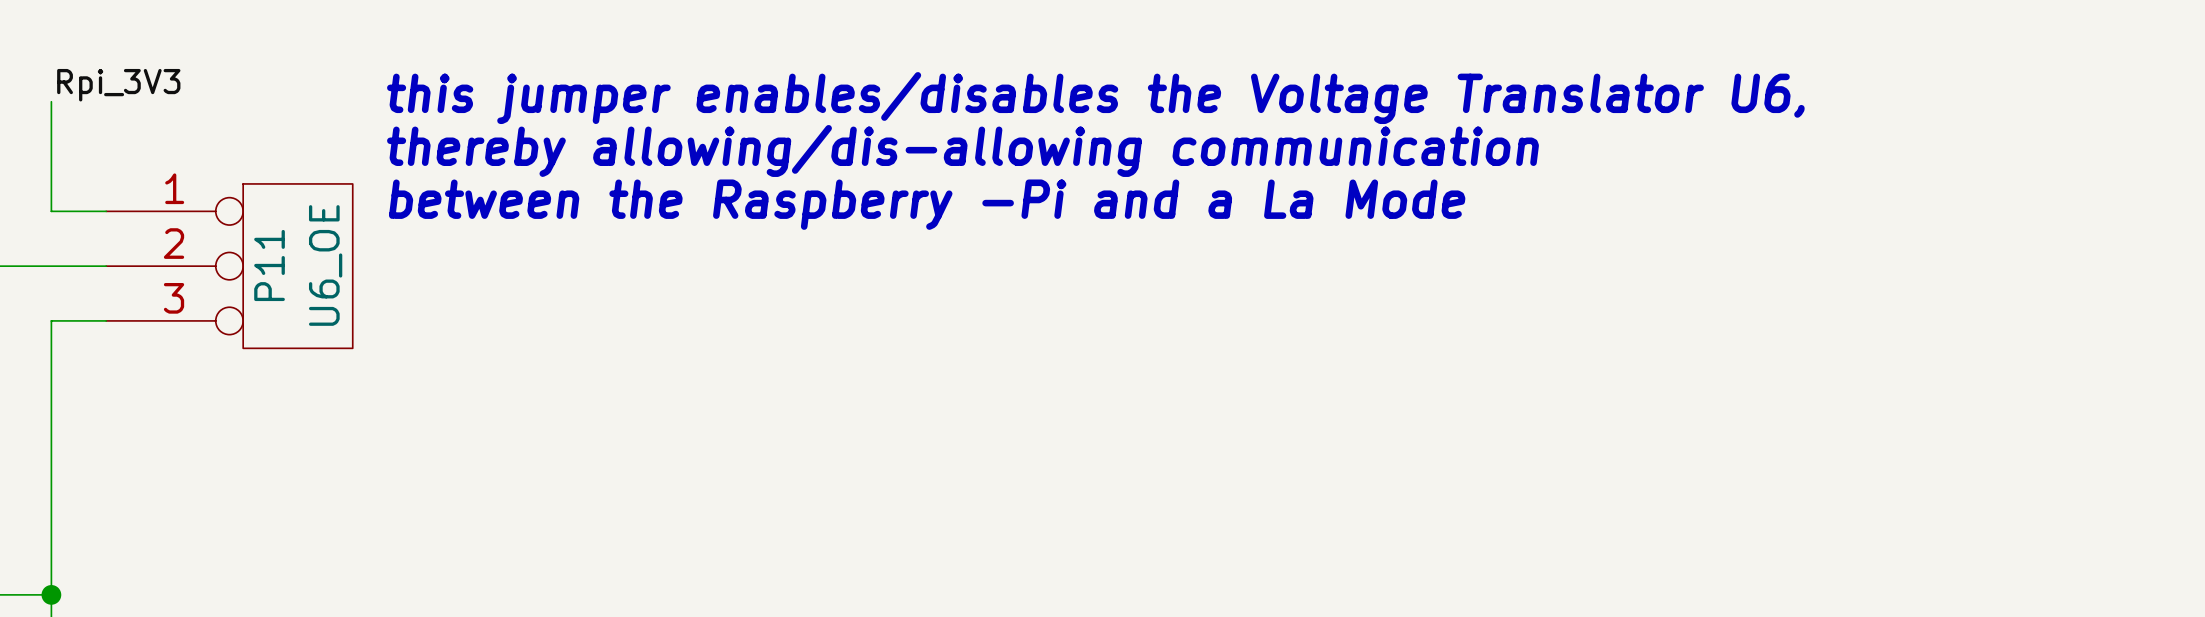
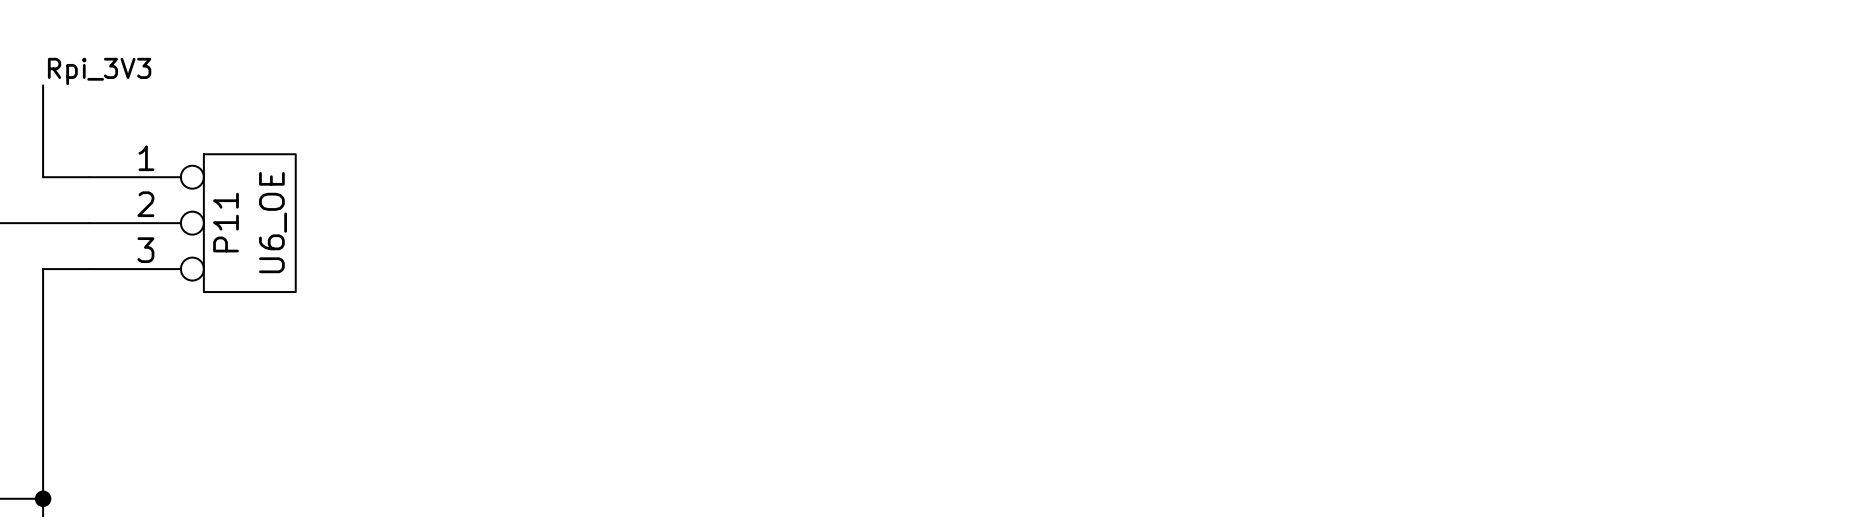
text: this jumper enables/disables the Voltage Translator U6, (1095, 98) -> none
text: thereby allowing/dis-allowing communication (962, 150) -> none
text: between the Raspberry -Pi and a La Mode (927, 204) -> none

